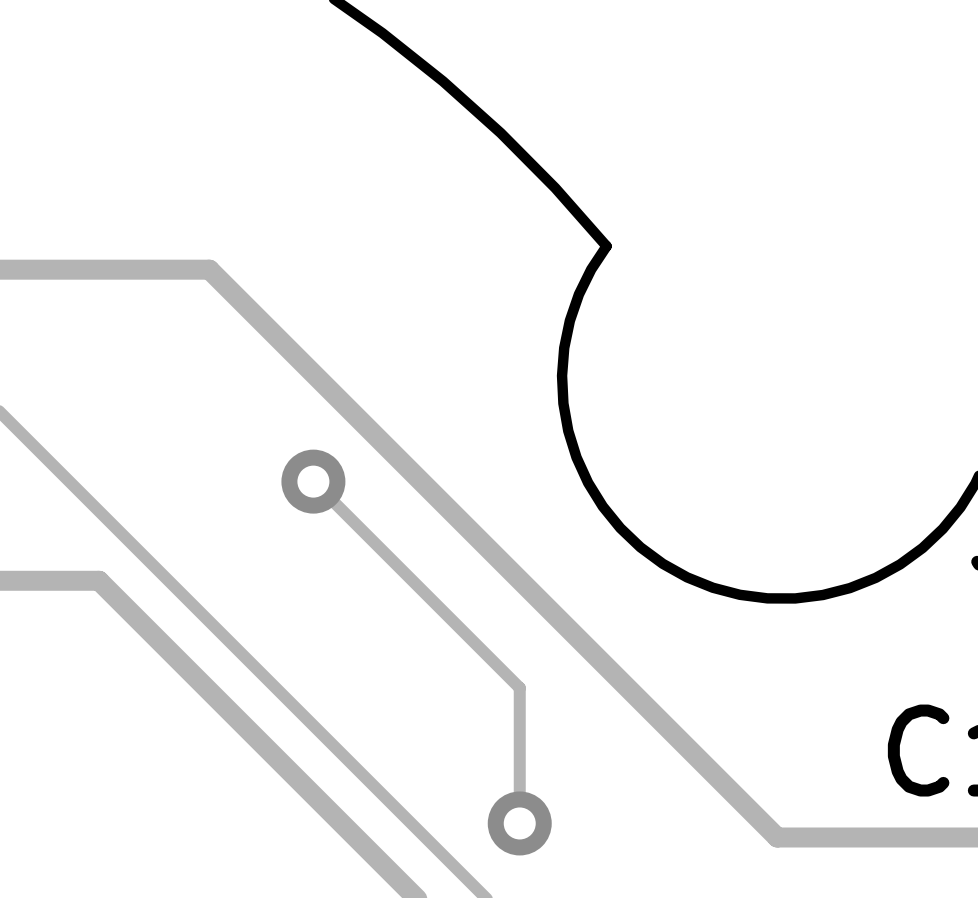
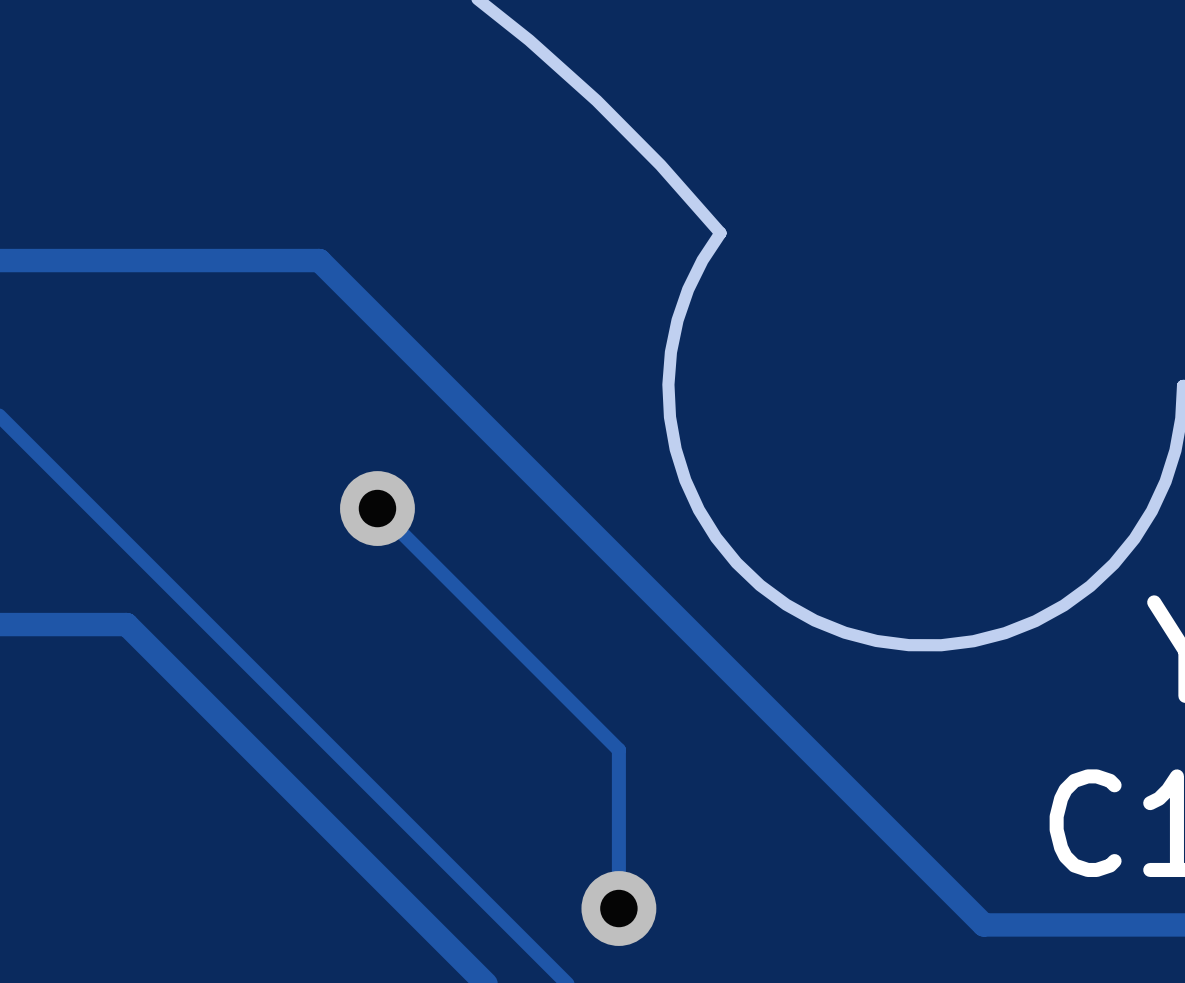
track: (209, 269) (777, 837) (831, 837) -> (255, 260) (319, 260) (983, 924)

